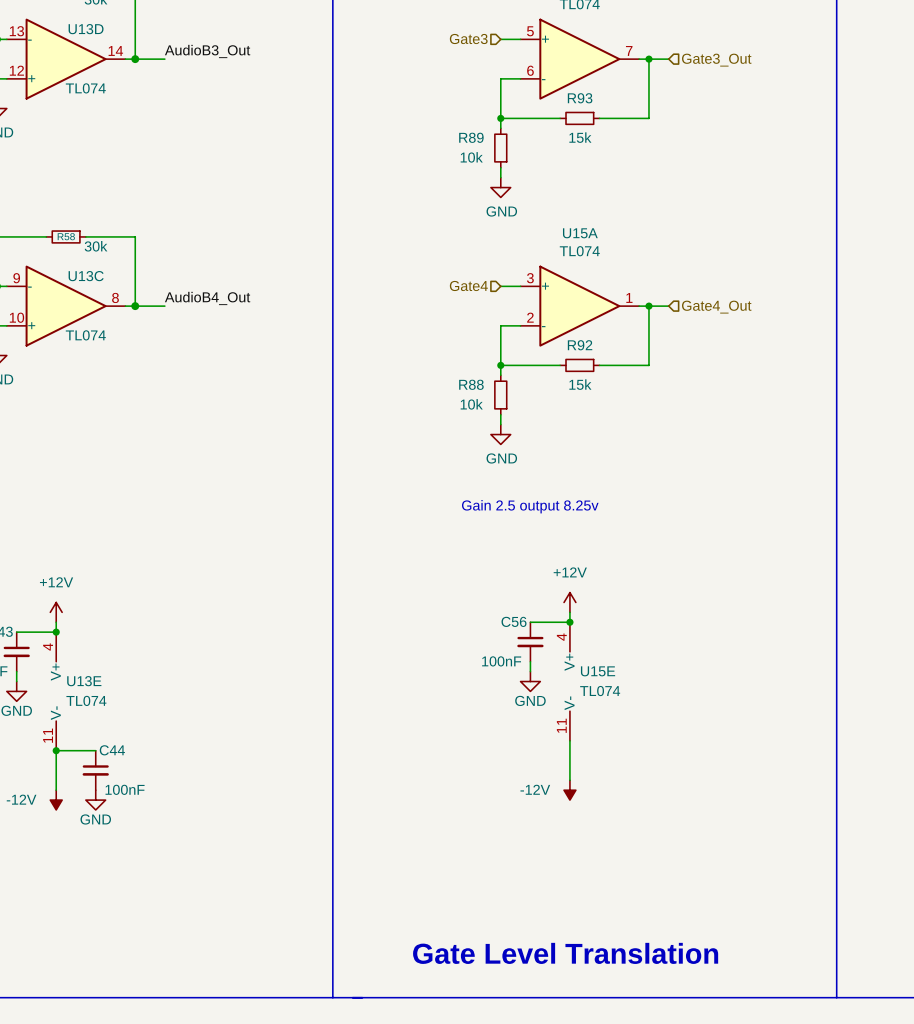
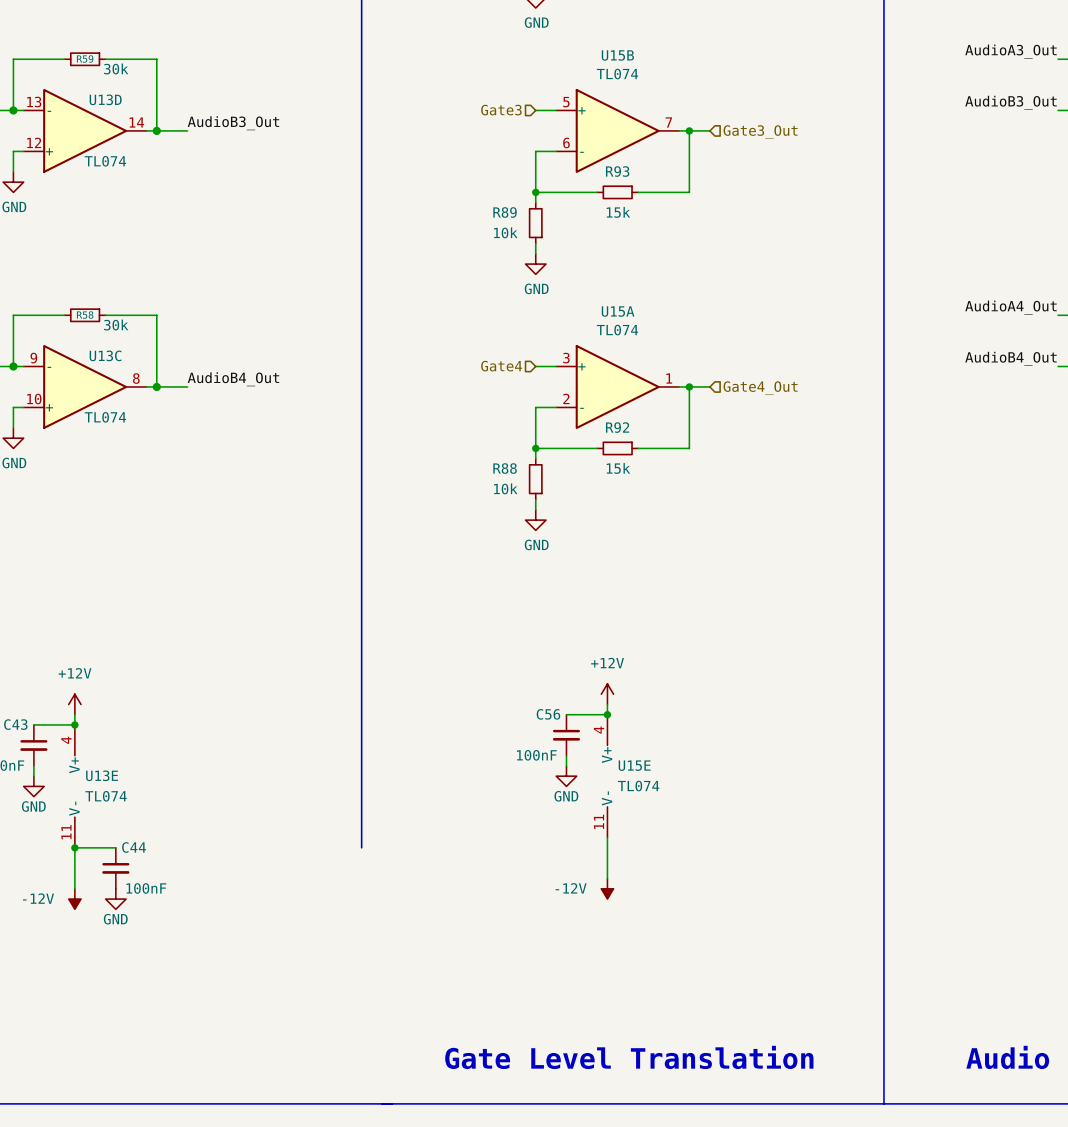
text: Gain 2.5 output 8.25v (530, 506) -> none
line: (332, 750) (332, 997) -> none

